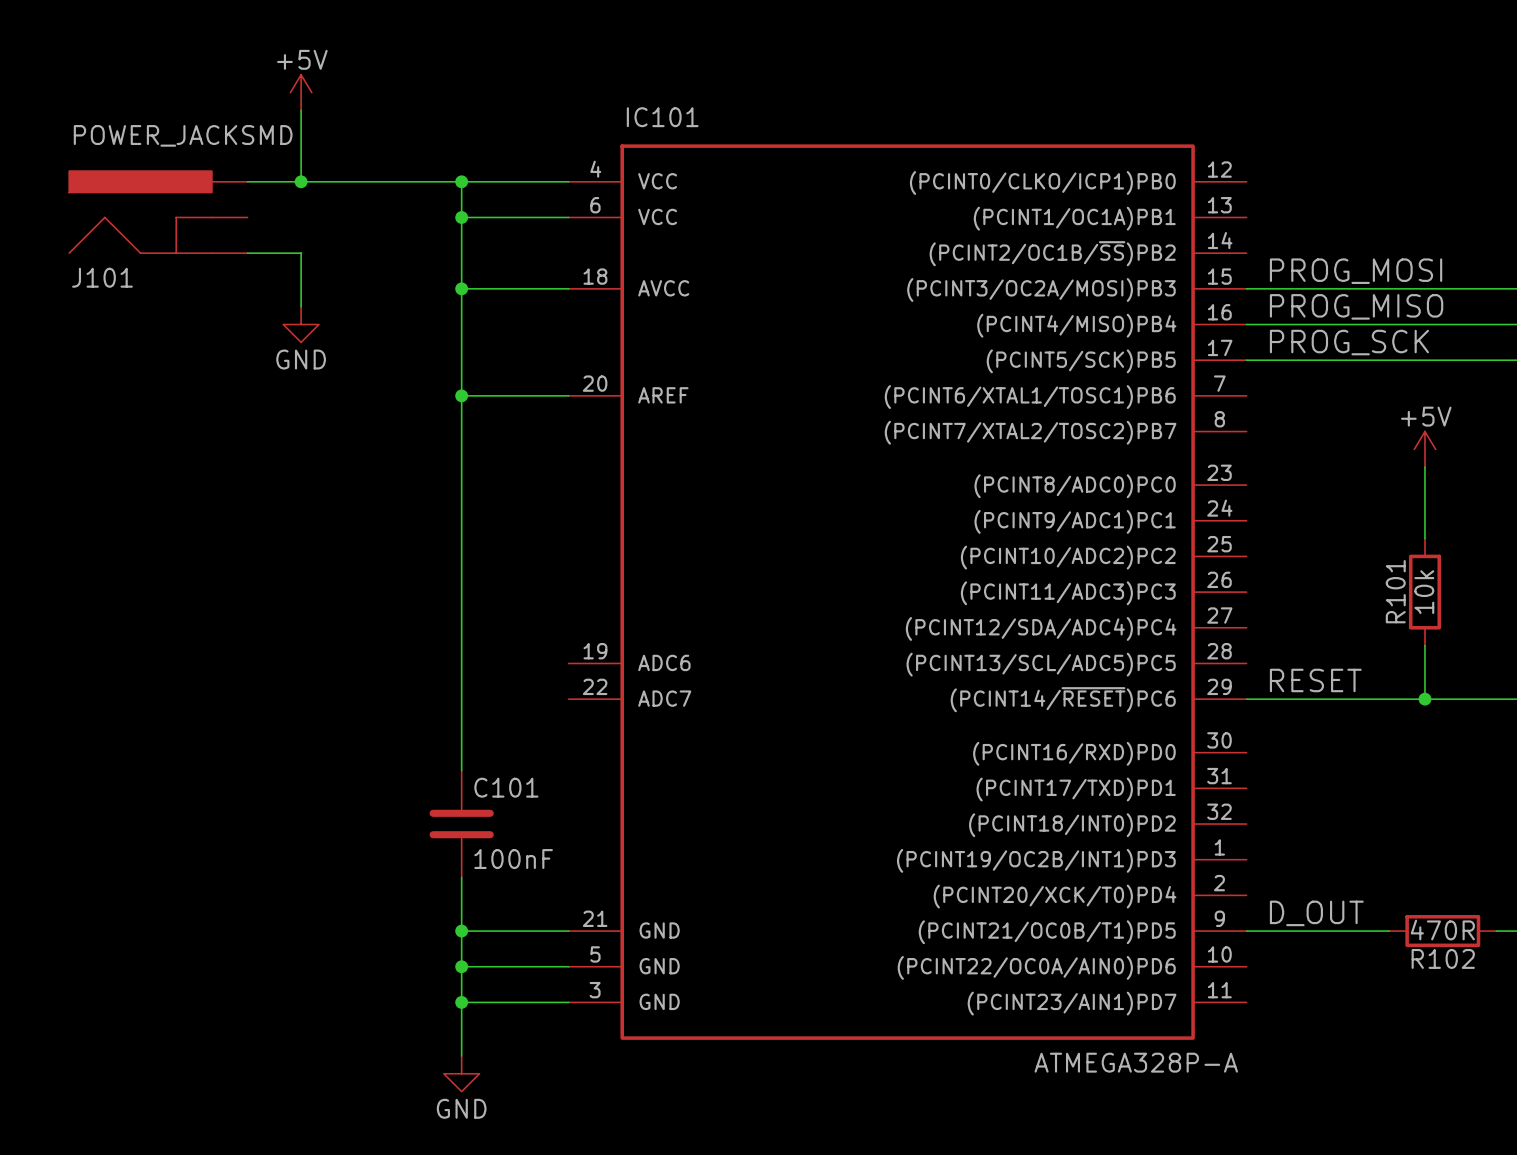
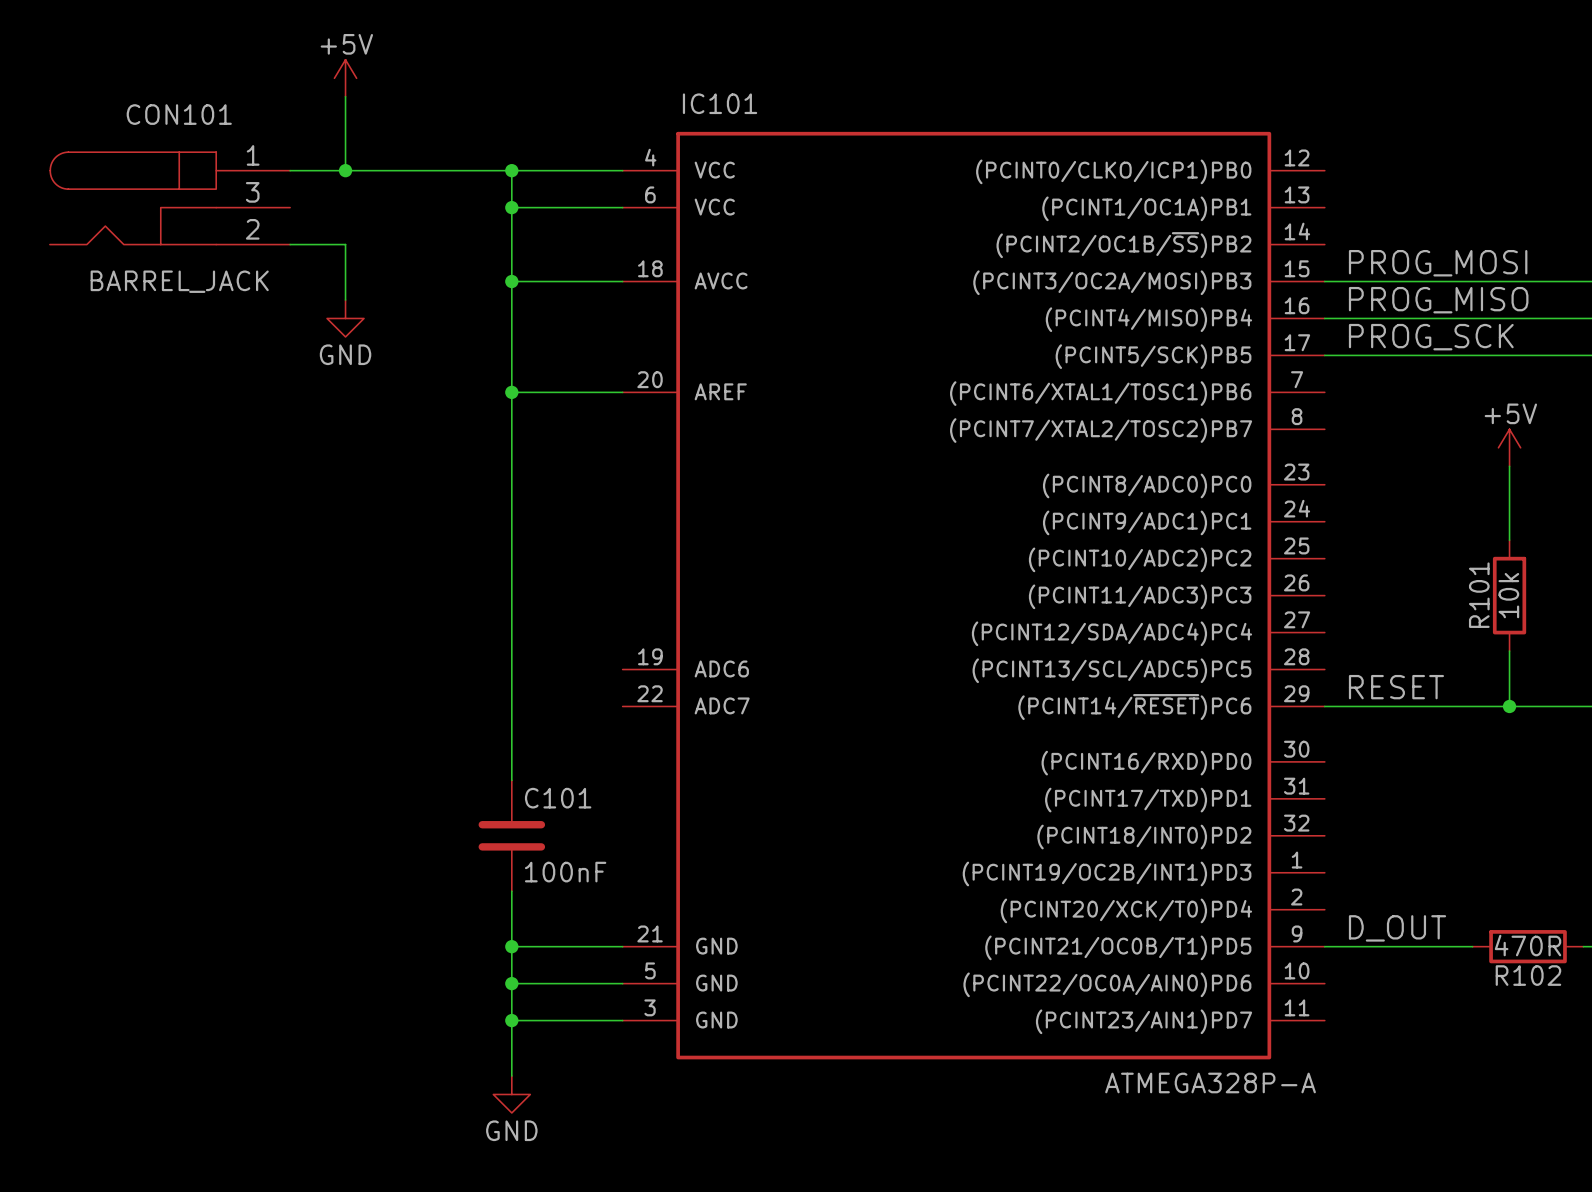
CON101: none -> BARREL_JACK (170, 198)
J101: POWER_JACKSMD (158, 212) -> none

